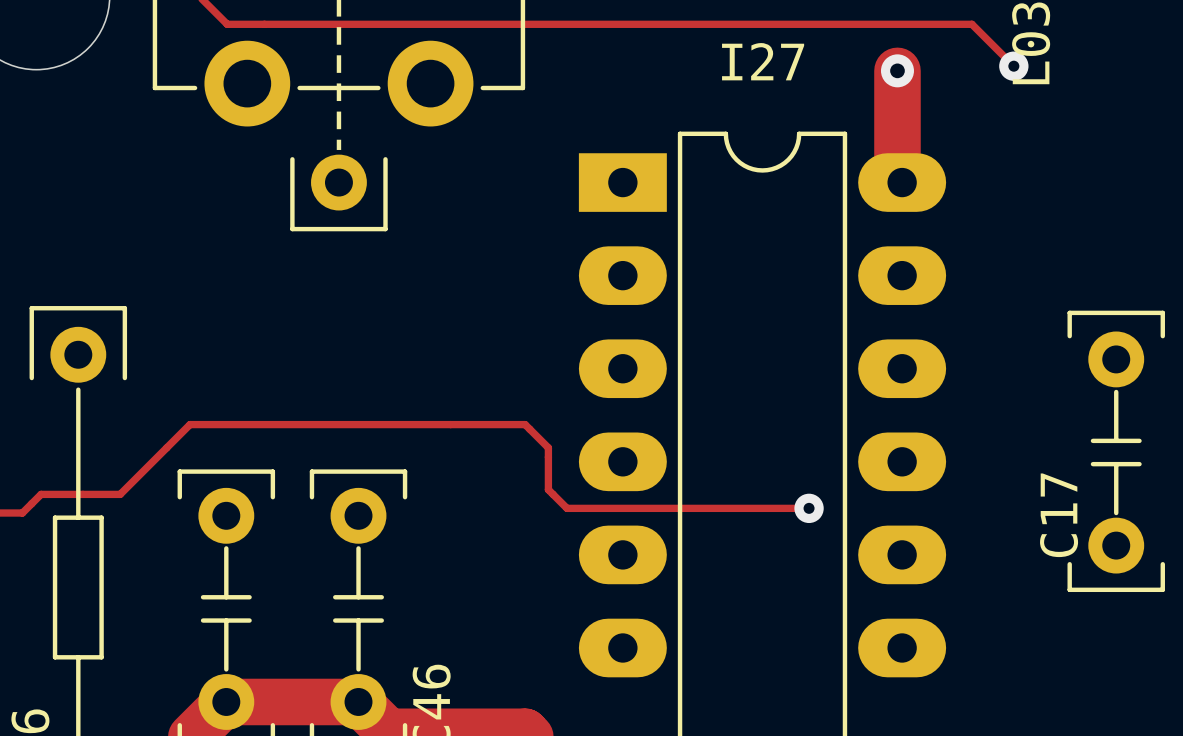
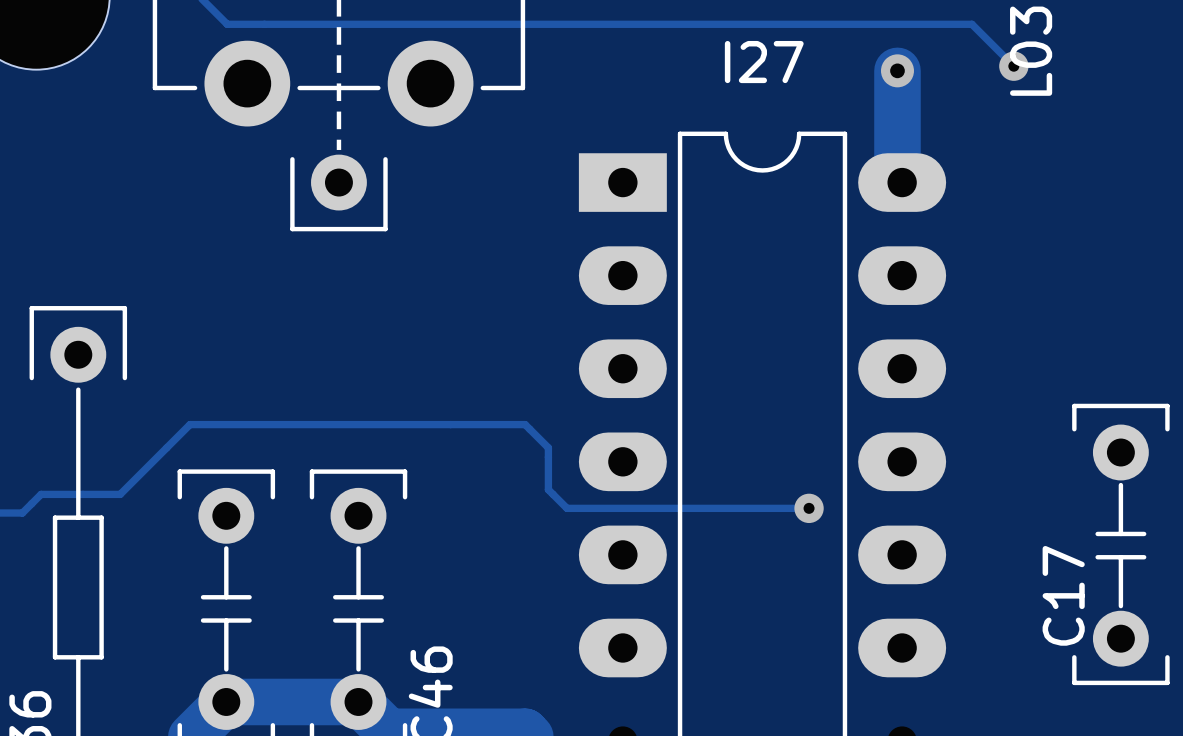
C17 position: (1116, 451) -> (1120, 544)

